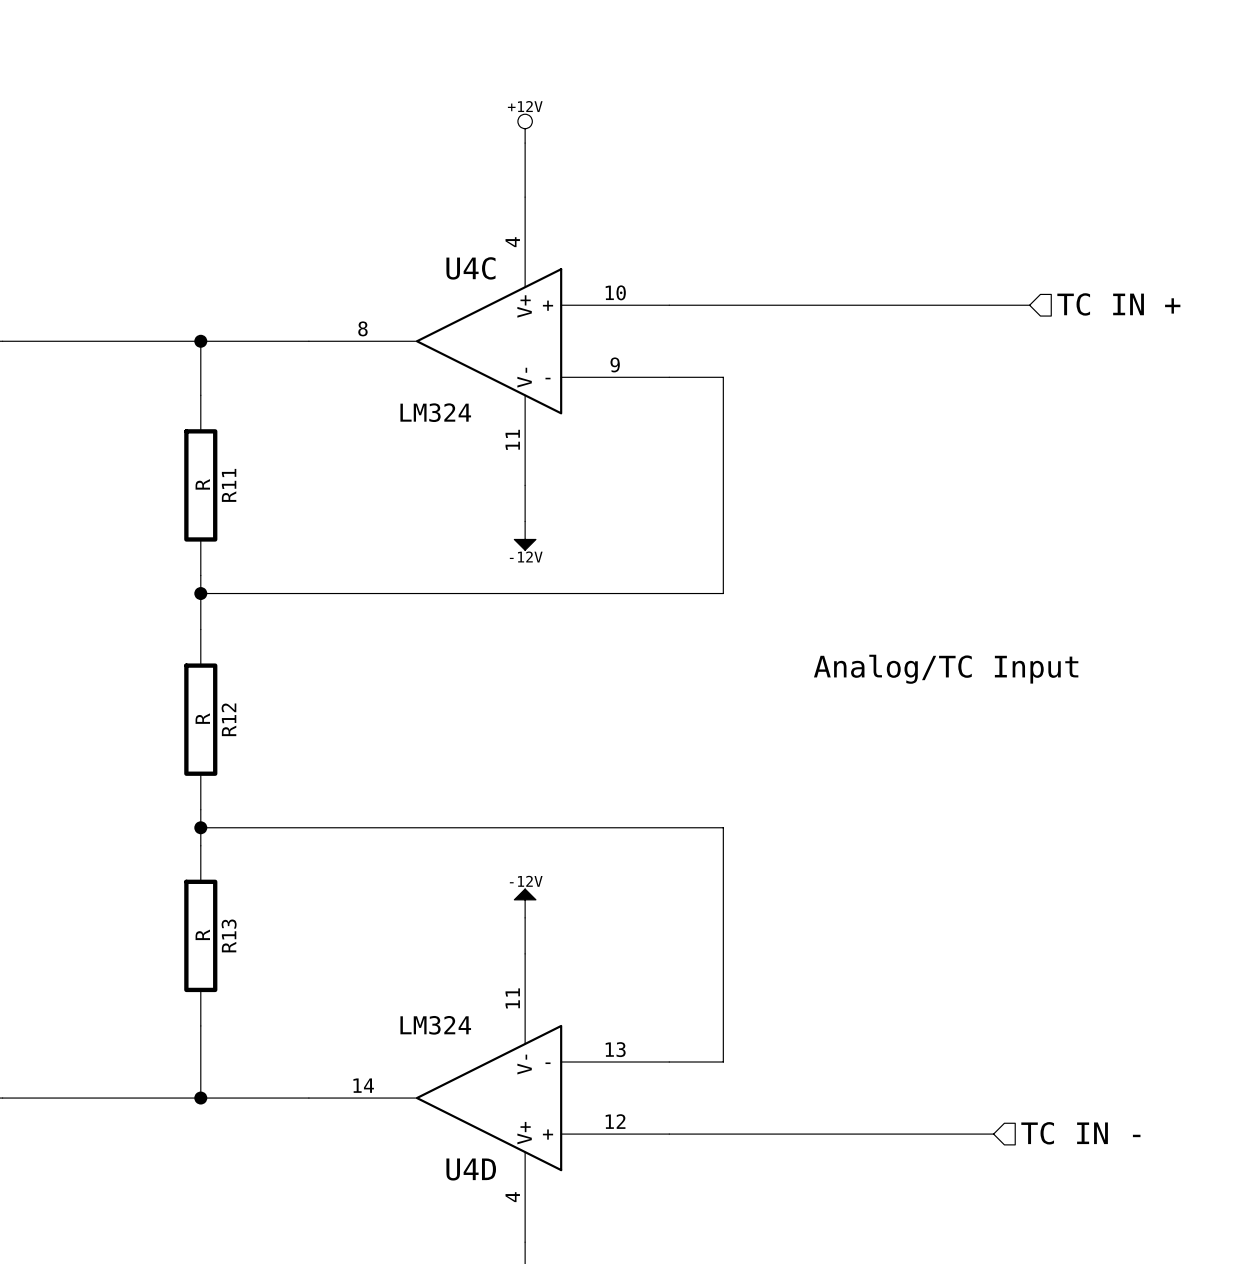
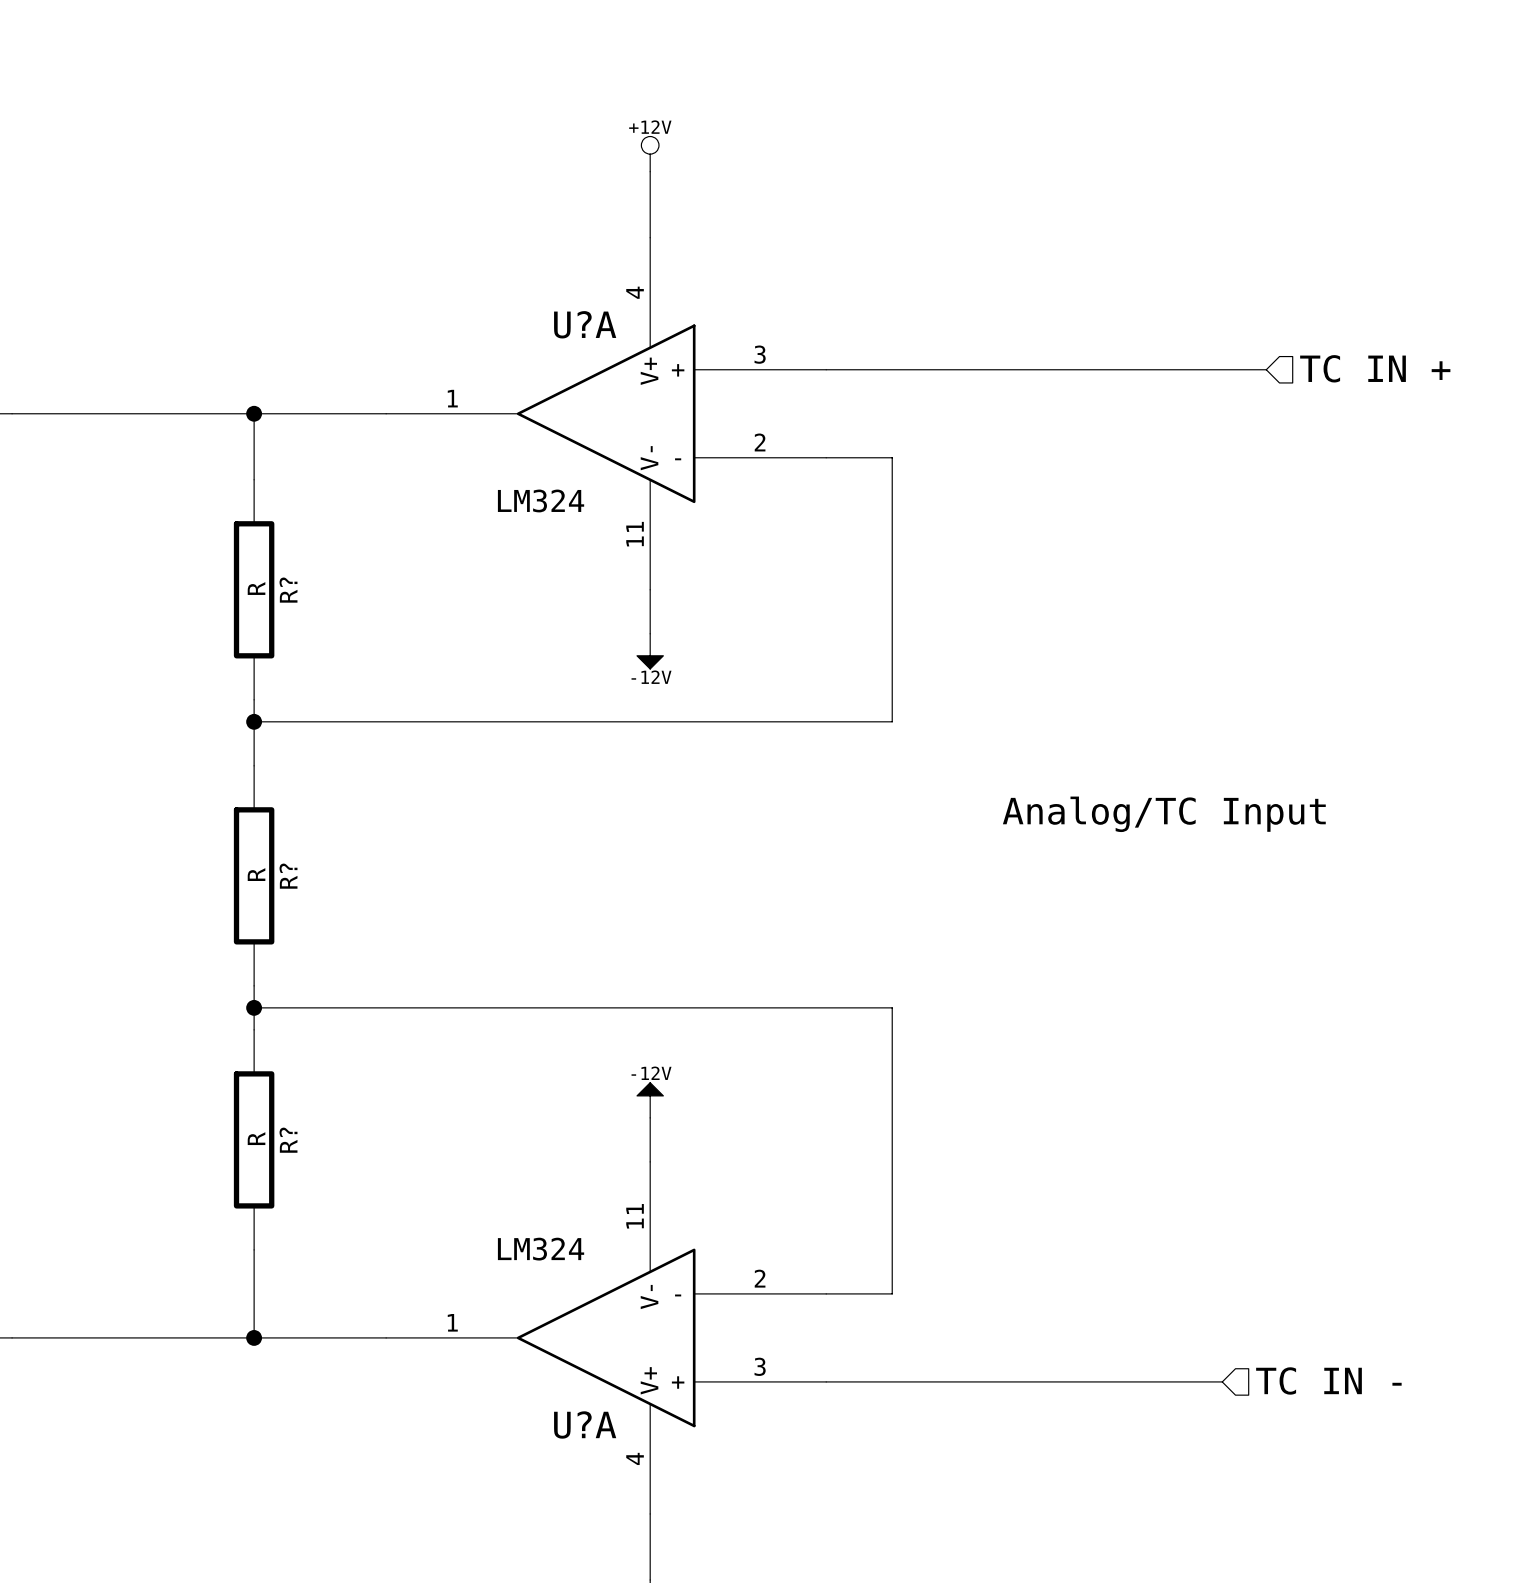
U4C name: U4C (470, 268) -> U?A (585, 324)
U4C pin number: 10 (615, 292) -> 3 (760, 354)
U4C pin number: 8 (362, 328) -> 1 (452, 398)
U4C pin number: 9 (615, 364) -> 2 (760, 442)
R11 name: R11 (229, 485) -> R? (288, 590)
R12 name: R12 (228, 719) -> R? (288, 876)
R13 name: R13 (229, 935) -> R? (288, 1140)
U4D pin number: 13 (615, 1049) -> 2 (760, 1278)
U4D pin number: 14 (363, 1085) -> 1 (452, 1322)
U4D pin number: 12 (615, 1121) -> 3 (760, 1366)
U4D name: U4D (471, 1169) -> U?A (585, 1424)

